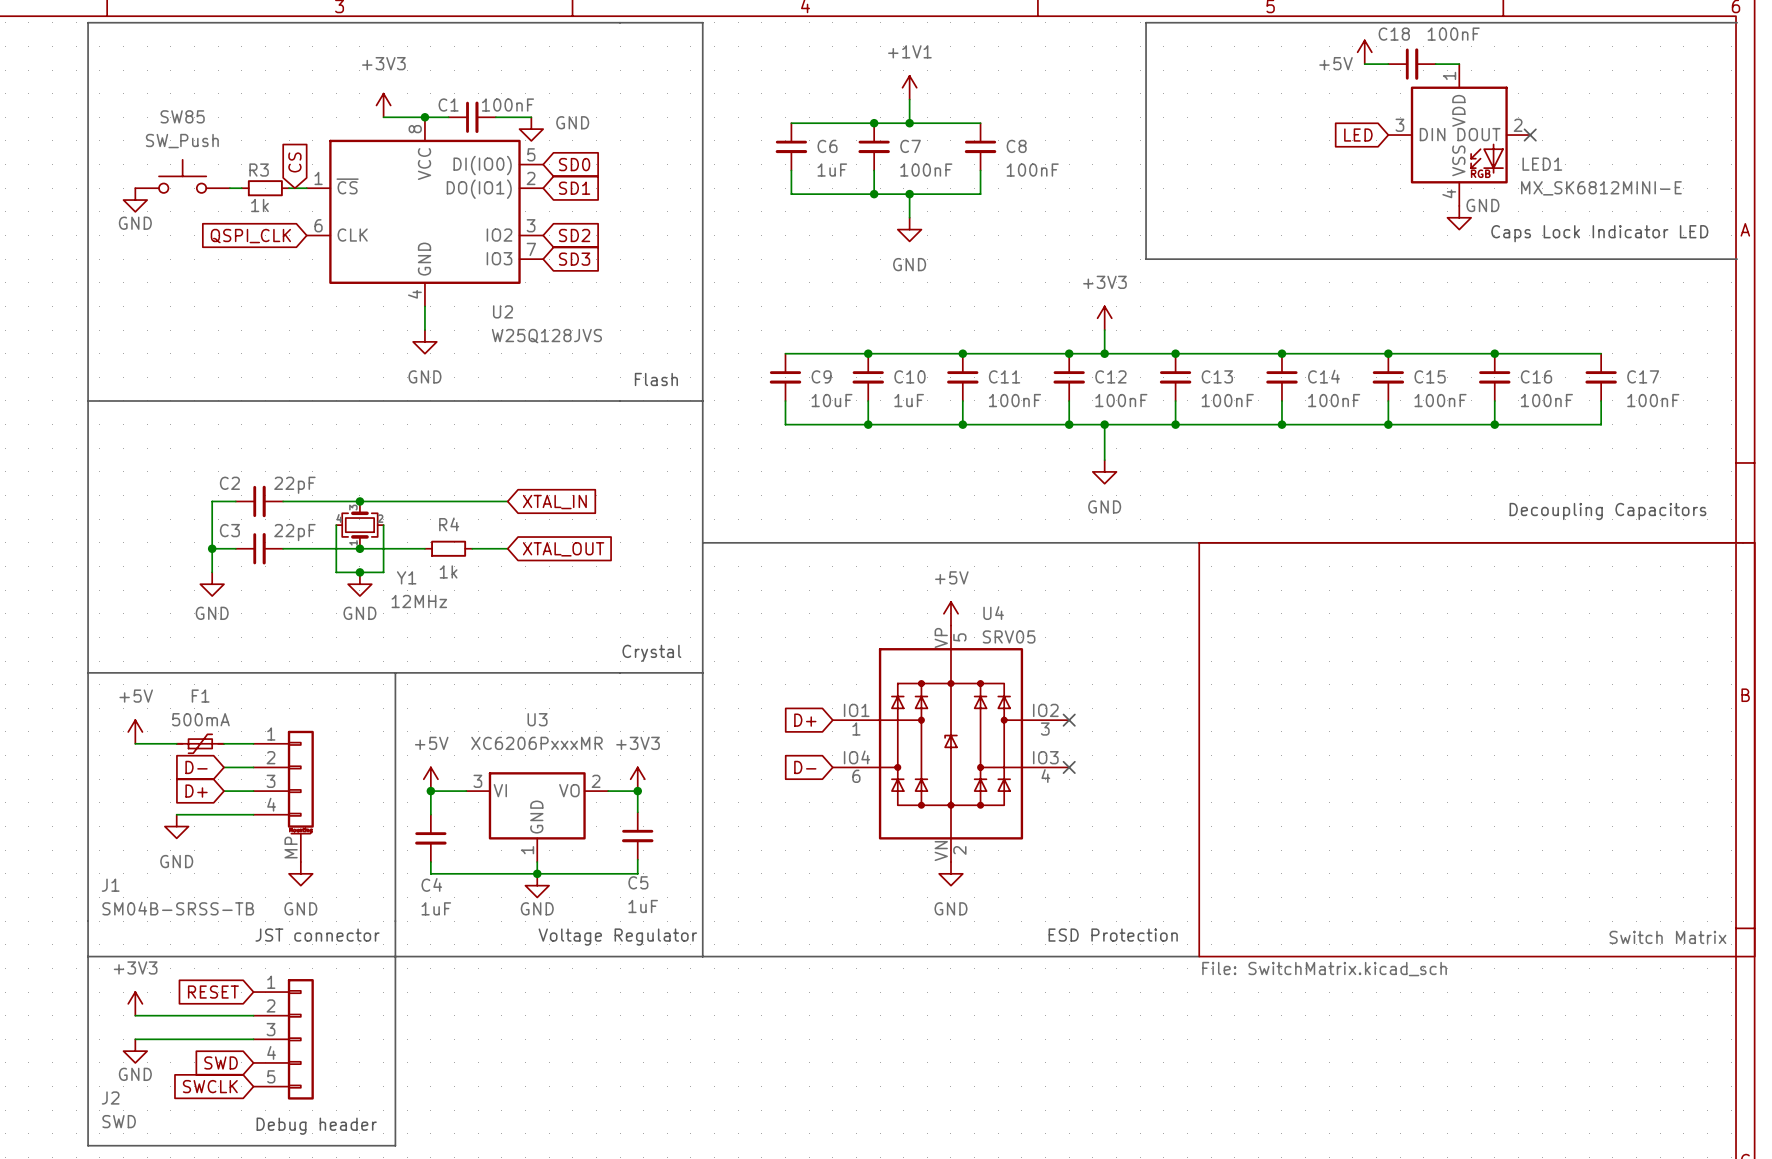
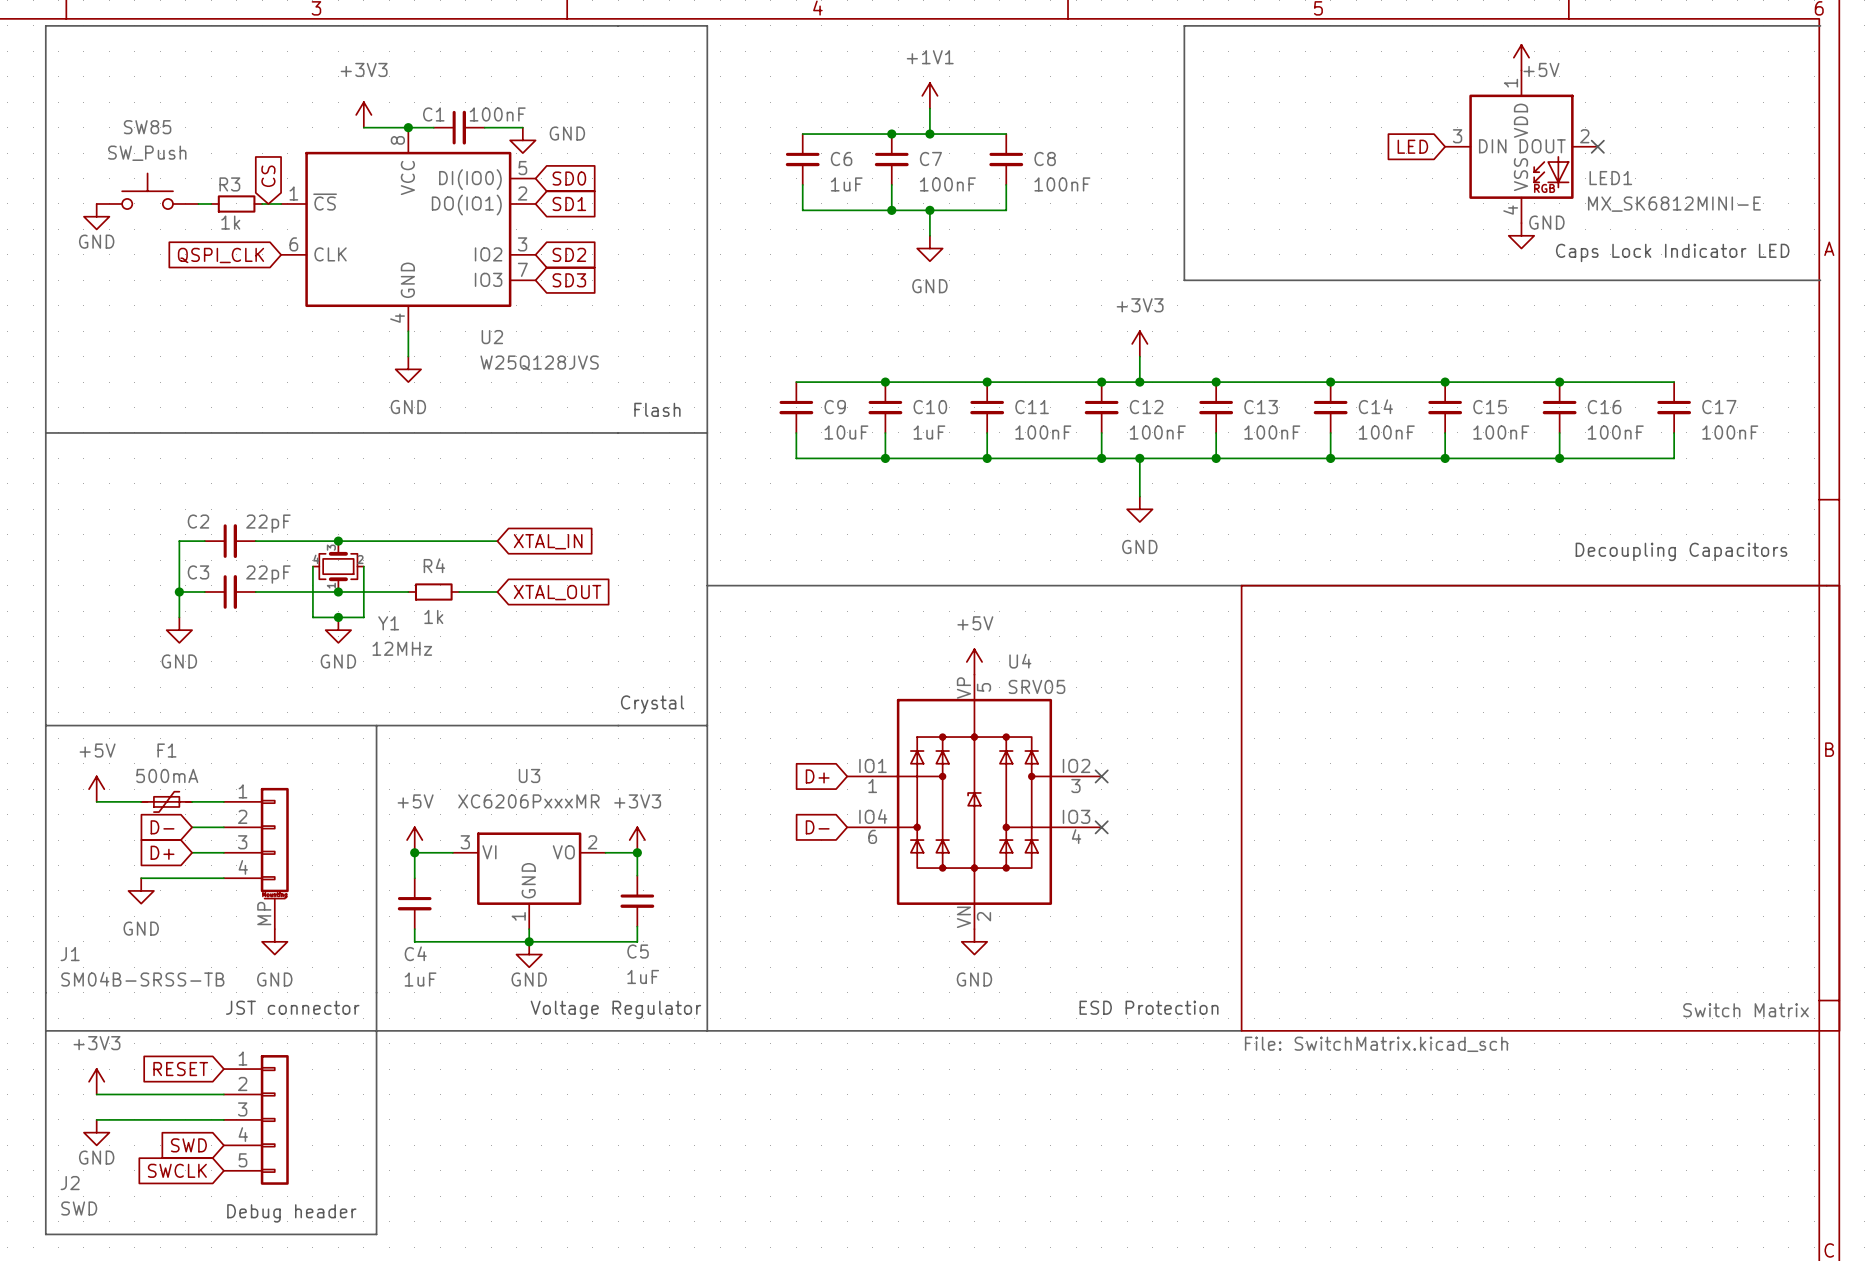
power symbol position: +5V (1364, 52) -> +5V (1521, 57)
power symbol text position: +5V (1336, 63) -> +5V (1541, 69)
wire: (1364, 64) (1388, 64) -> none
C18: 100nF (1412, 64) -> none
wire: (1435, 64) (1459, 64) -> none

